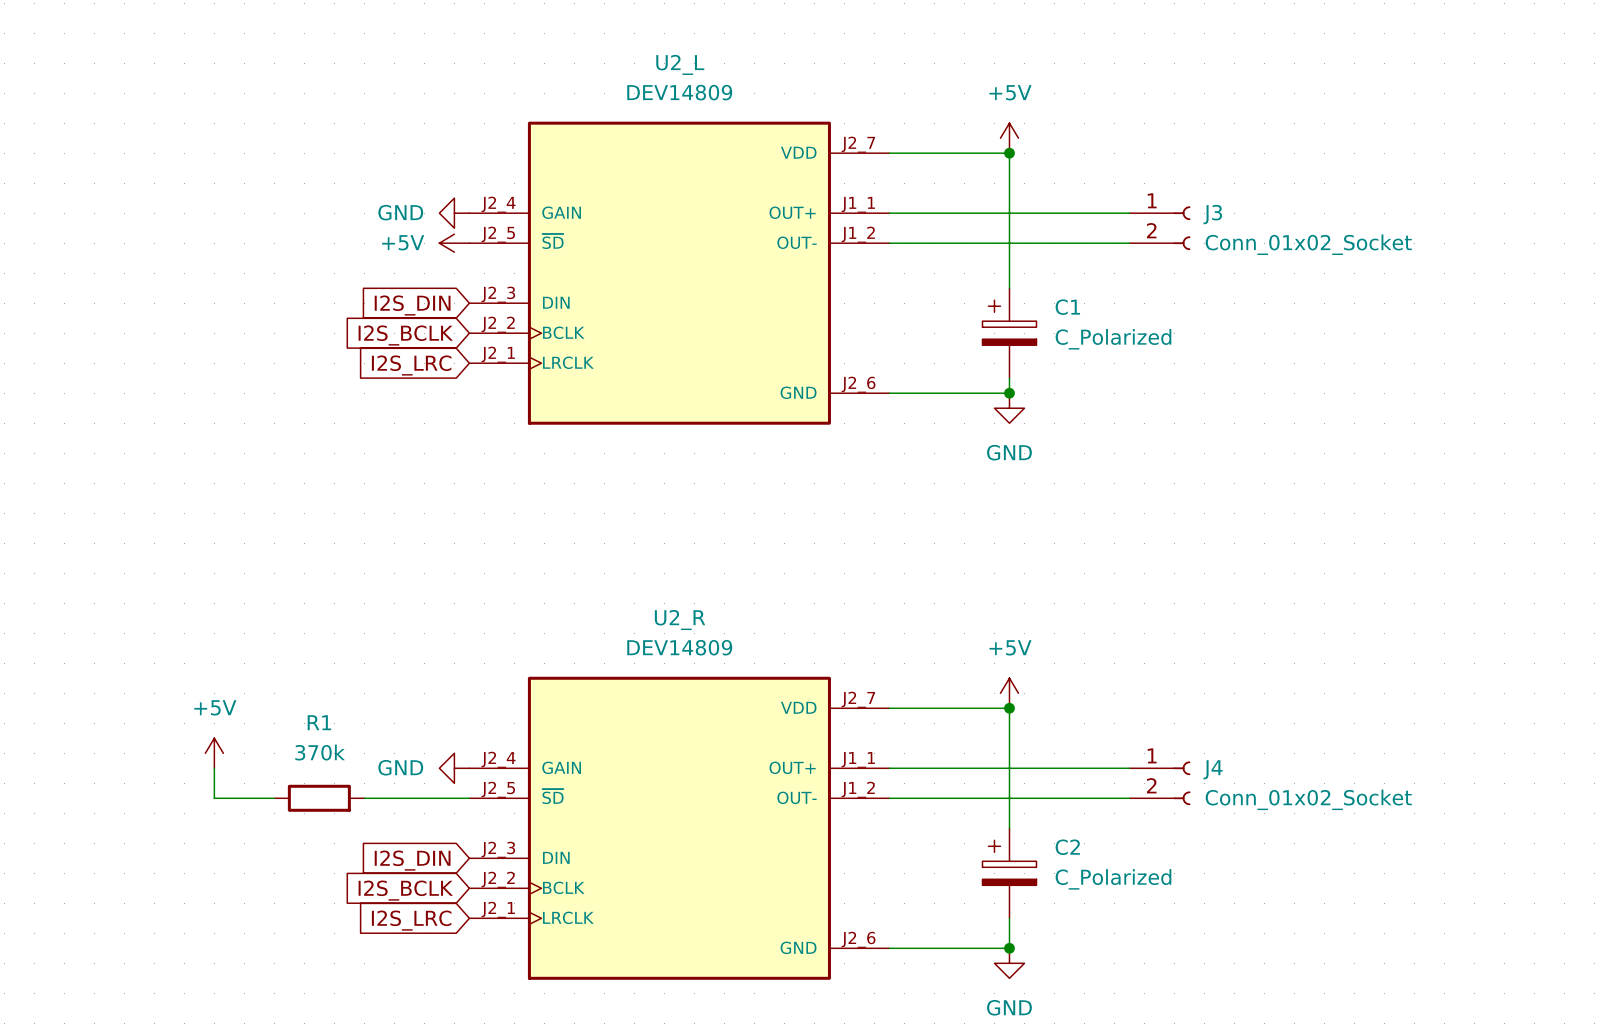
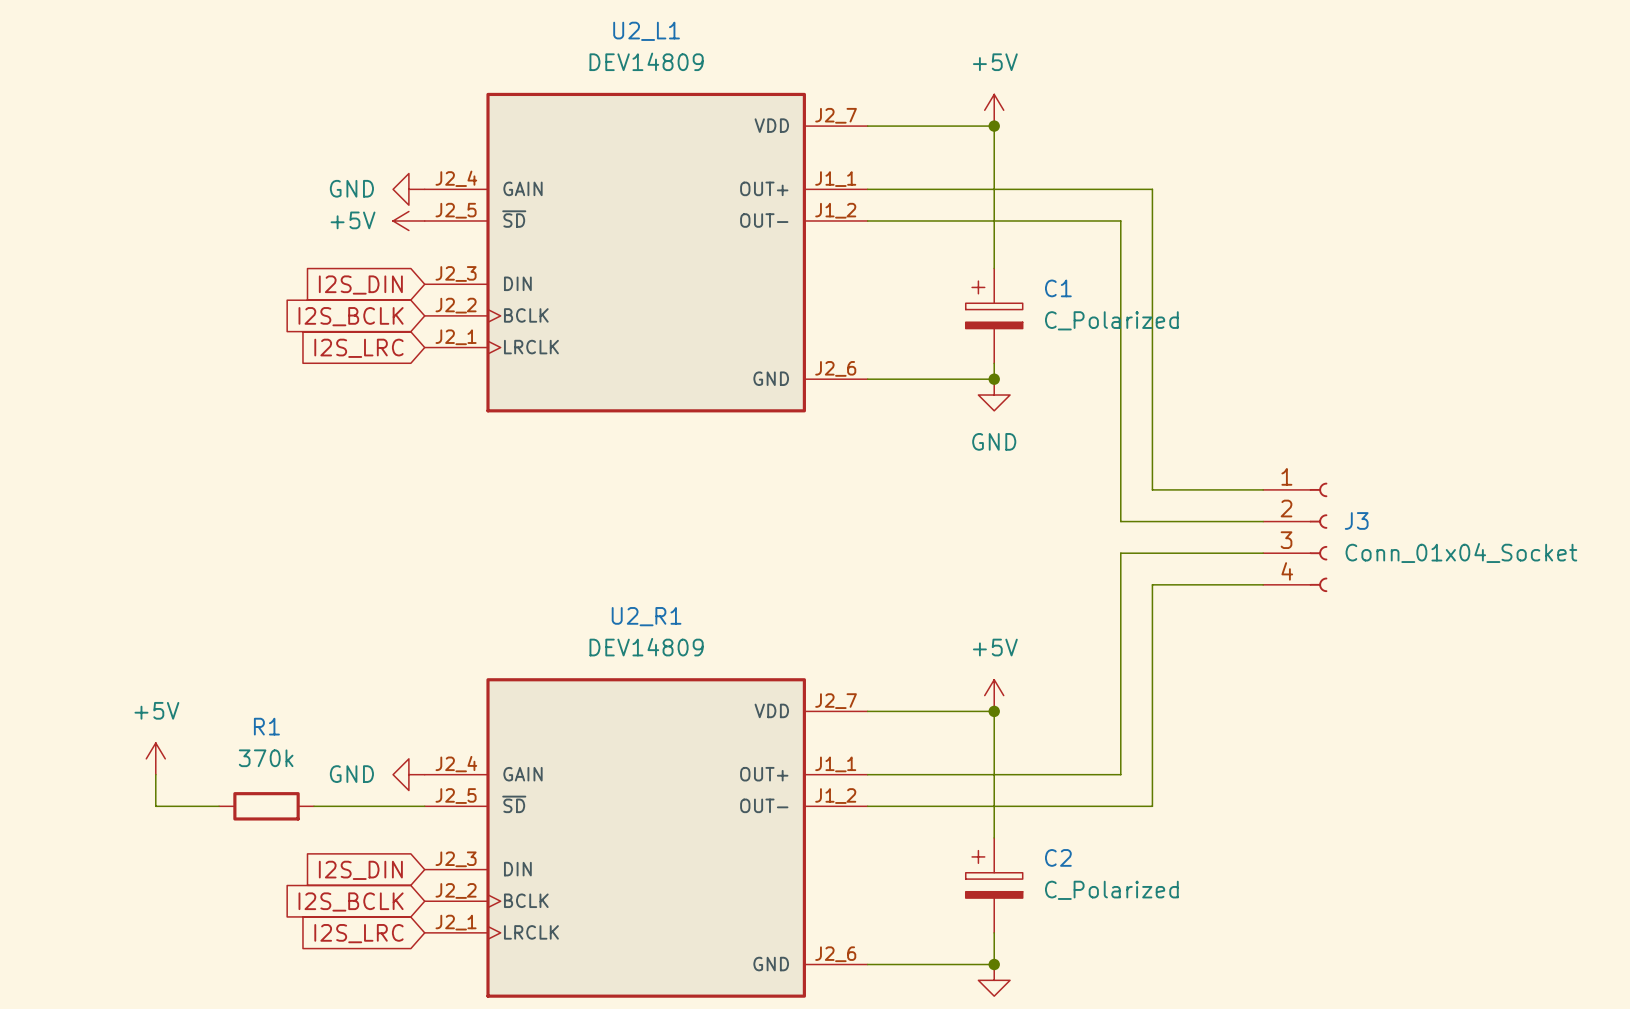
U2_L name: U2_L (680, 64) -> U2_L1 (646, 31)
J3 symbol: [1129, 206, 1191, 251] -> [1263, 482, 1328, 593]
wire: none -> (1120, 189) (1152, 189) (1152, 489) (1263, 489)
wire: none -> (1120, 220) (1120, 521) (1263, 521)
J3 value: Conn_01x02_Socket (1308, 244) -> Conn_01x04_Socket (1461, 552)
wire: none -> (1263, 553) (1120, 553) (1120, 774)
wire: none -> (1263, 584) (1152, 584) (1152, 806) (1120, 806)
U2_R name: U2_R (680, 619) -> U2_R1 (646, 616)
J4: Conn_01x02_Socket (1159, 783) -> none

